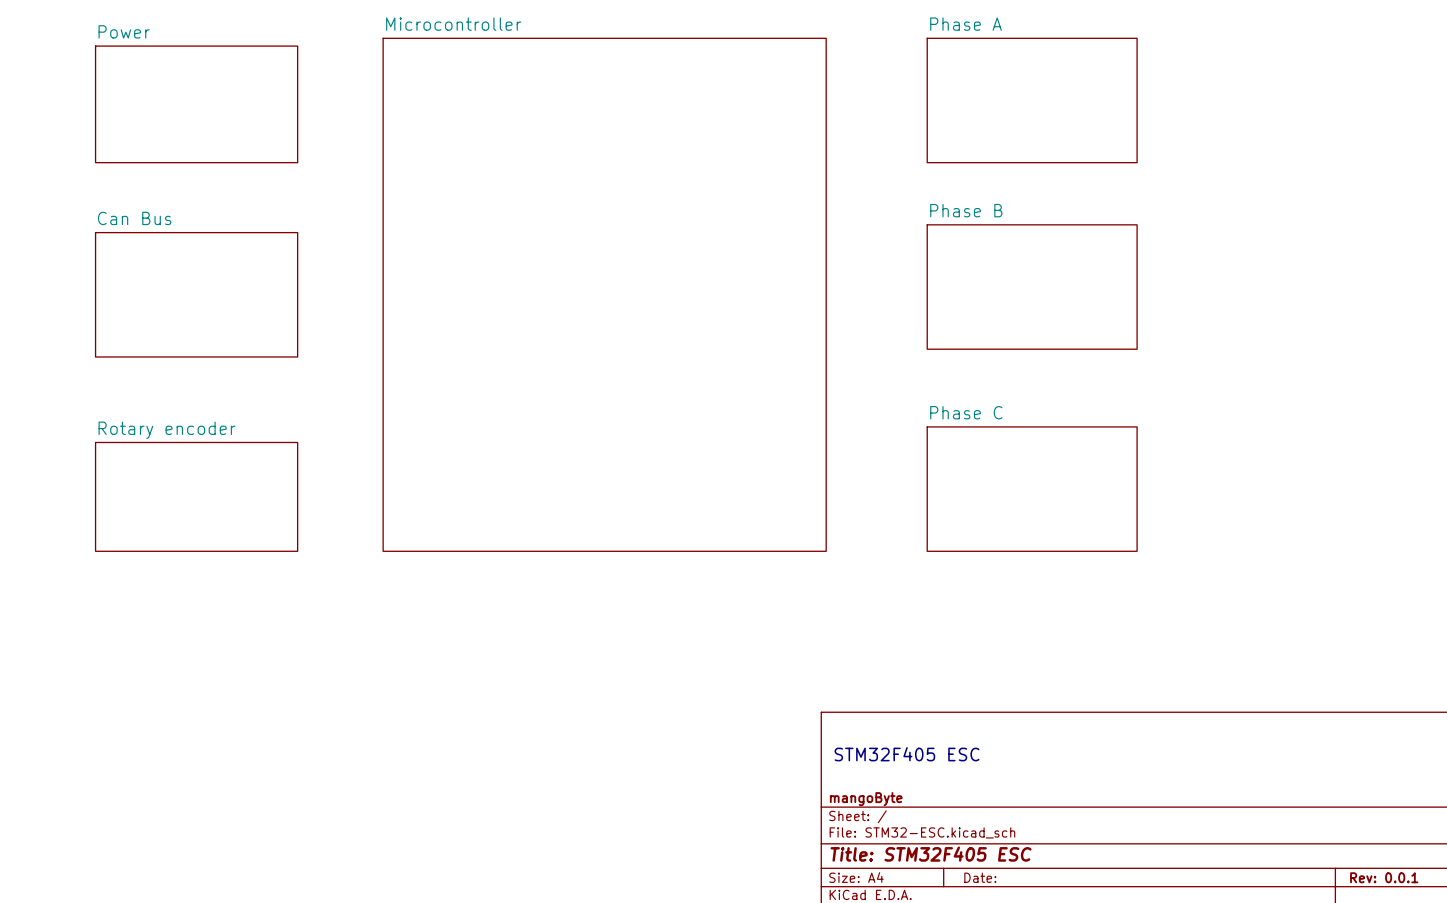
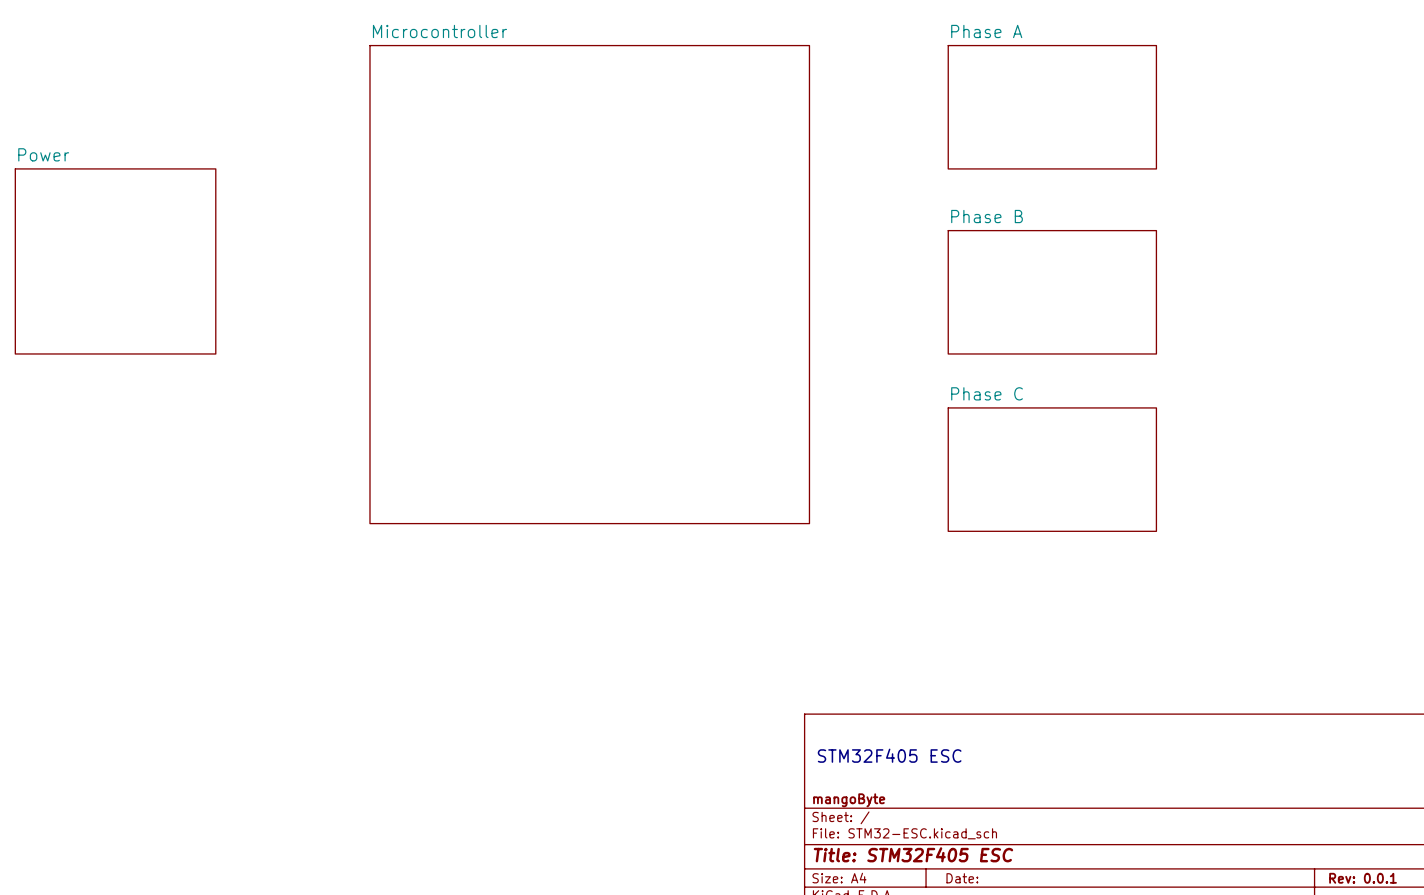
sheet Phase A position: (1032, 100) -> (1052, 107)
sheet Power: (196, 104) -> none
sheet Power: none -> (115, 261)
sheet Microcontroller: none -> (589, 284)
sheet Phase B position: (1032, 287) -> (1052, 292)
sheet Can Bus: (196, 294) -> none
sheet Microcontroller: (604, 294) -> none
sheet Phase C position: (1032, 489) -> (1052, 469)
sheet Rotary encoder: (196, 496) -> none

